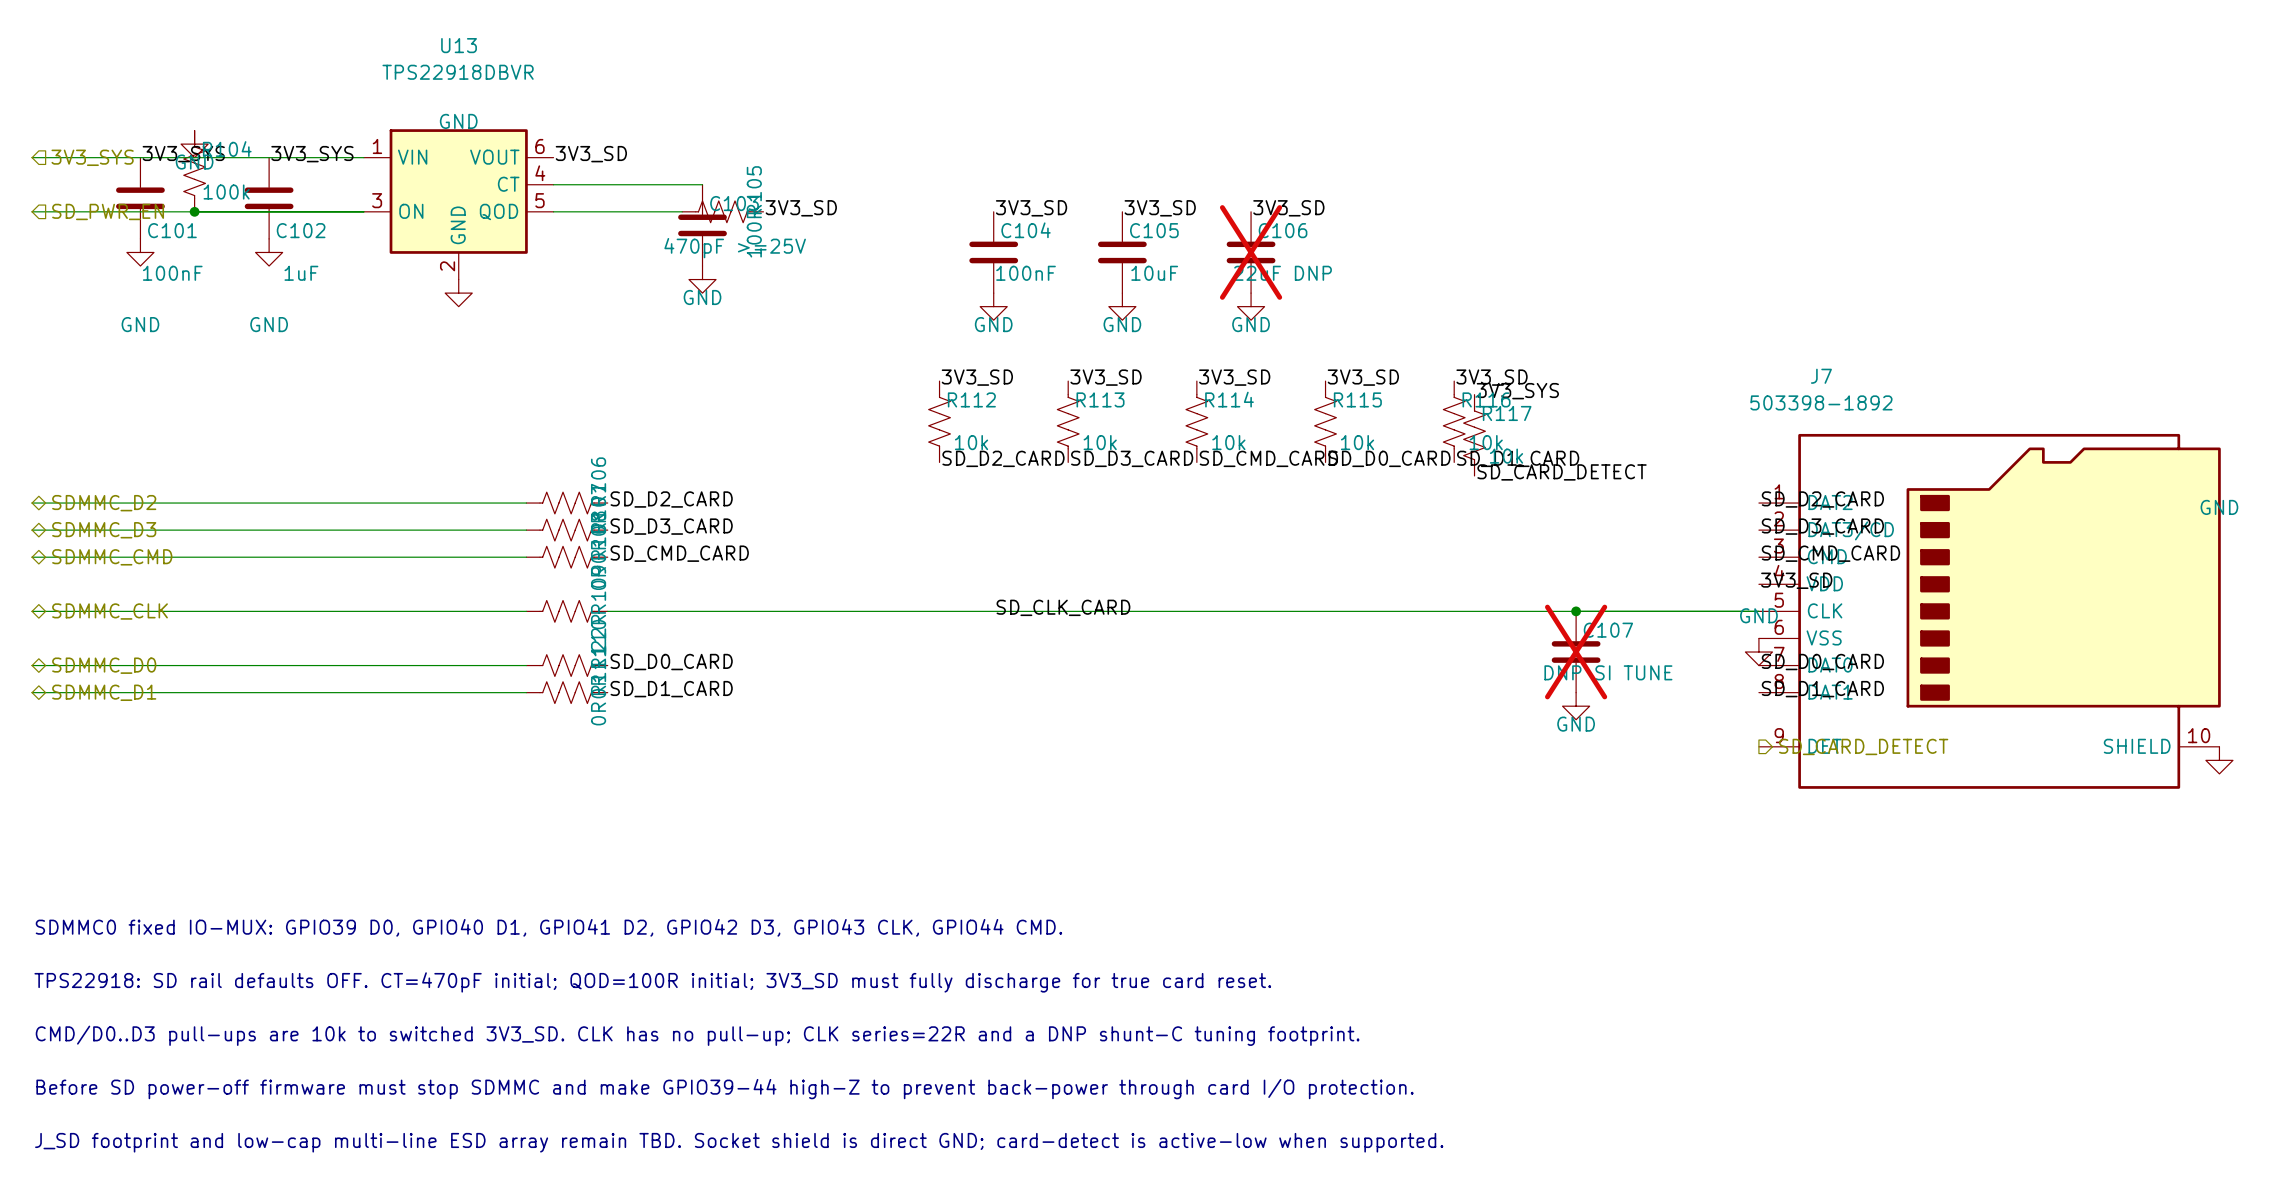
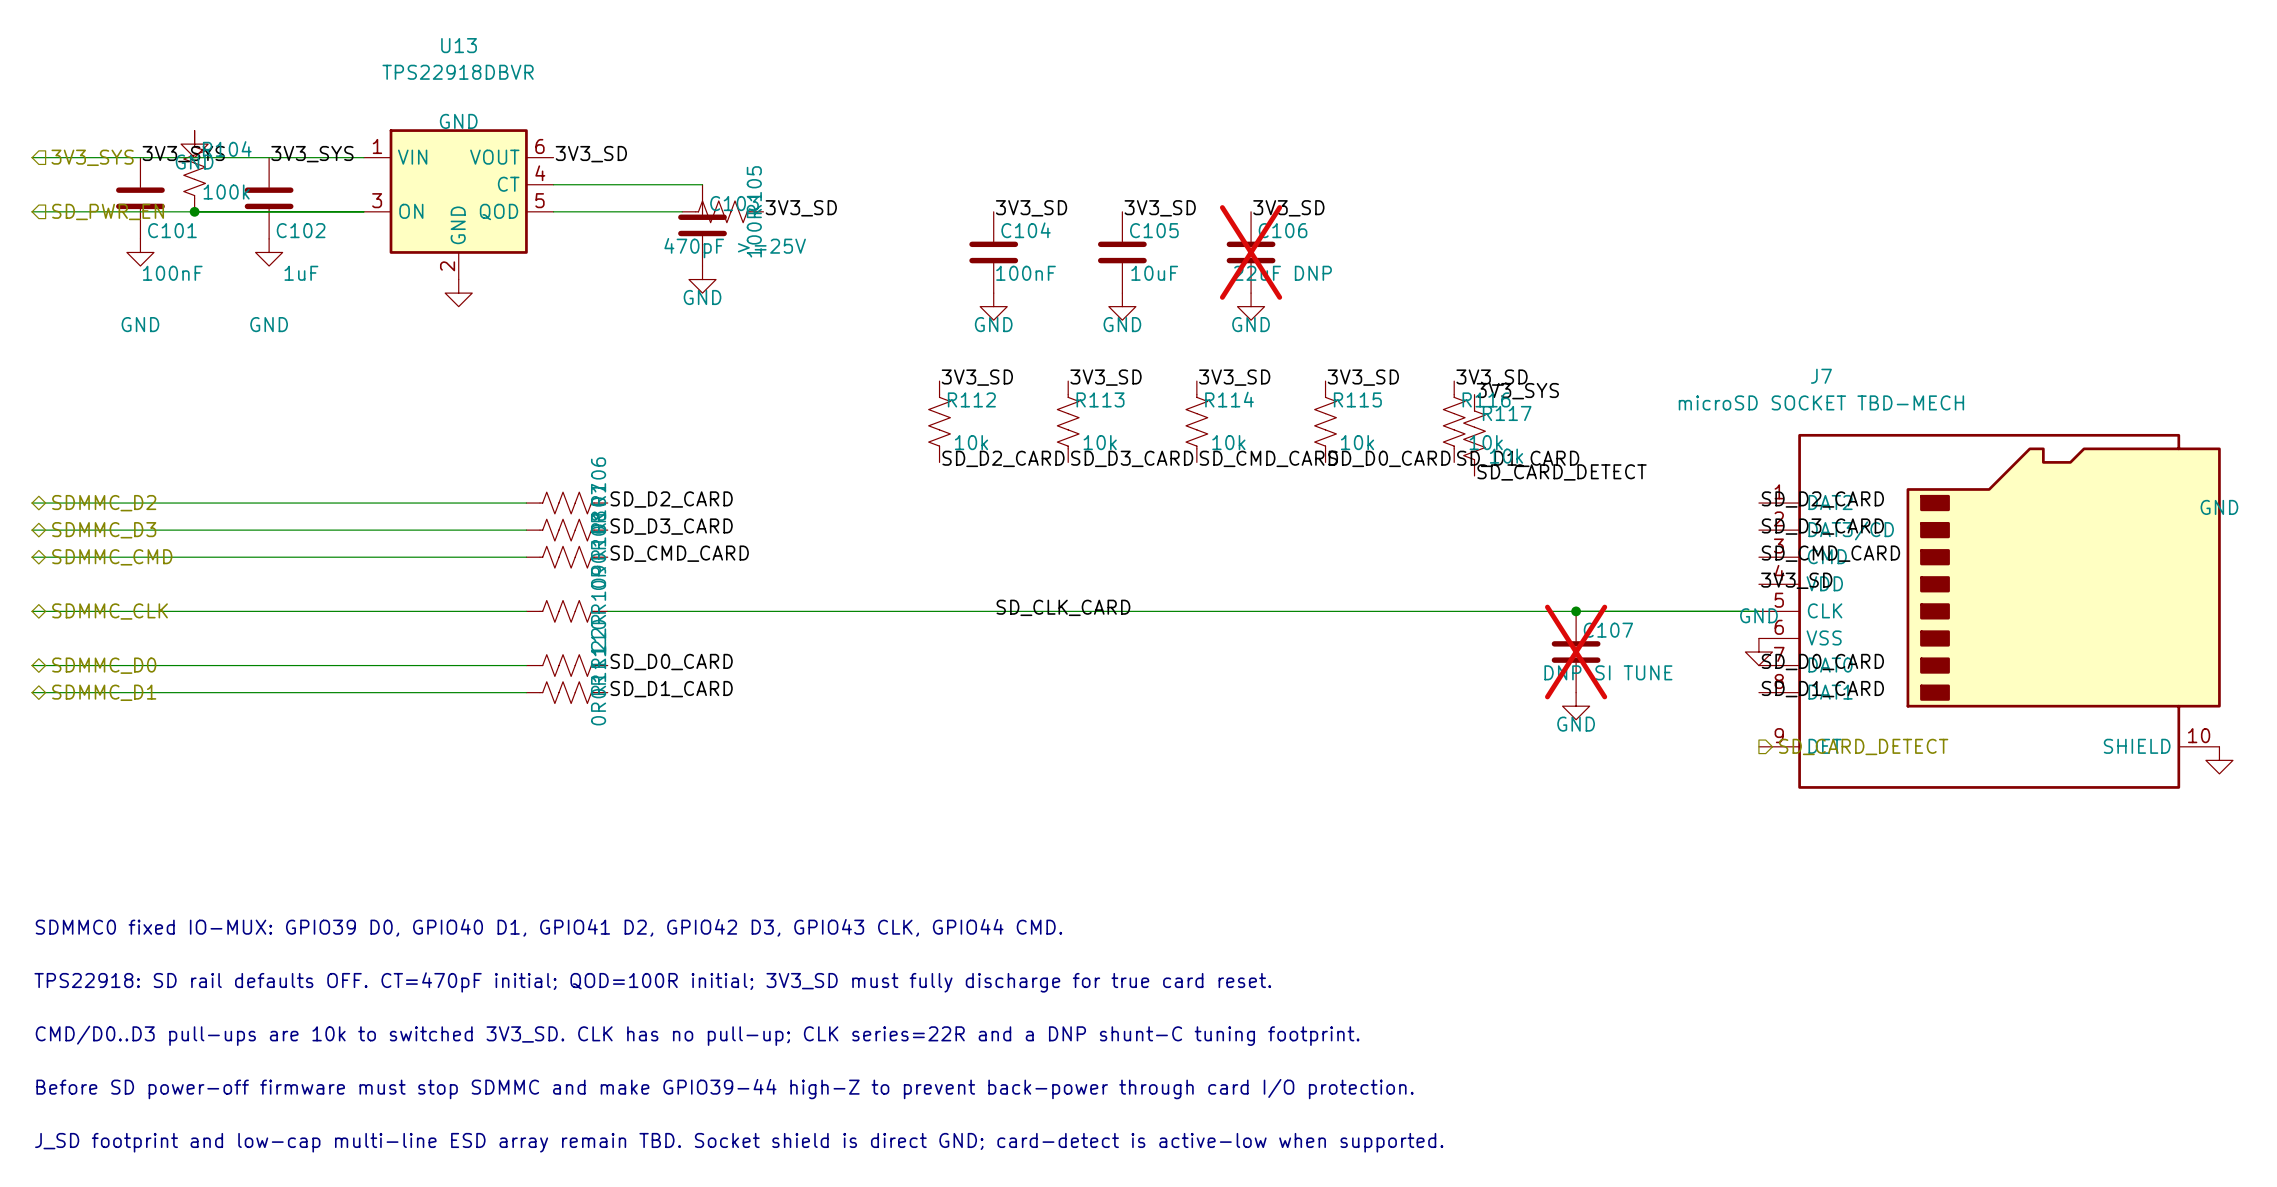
J7 value: 503398-1892 (1821, 402) -> microSD SOCKET TBD-MECH (1821, 402)

